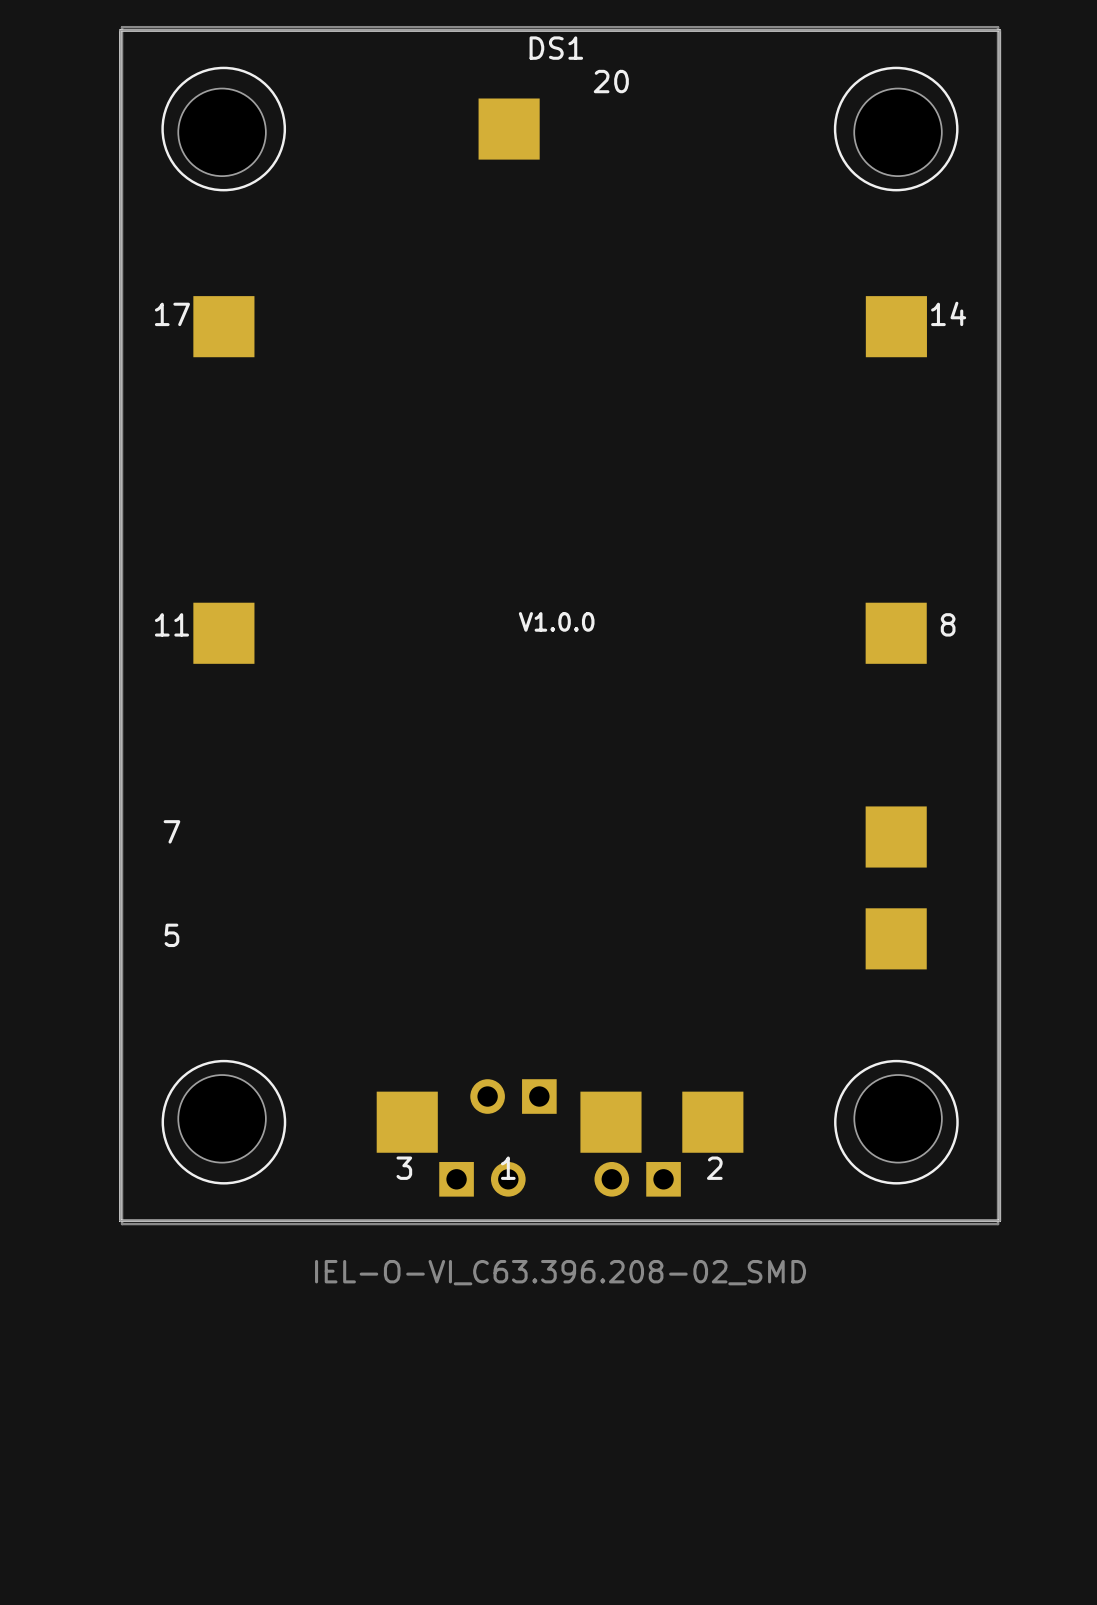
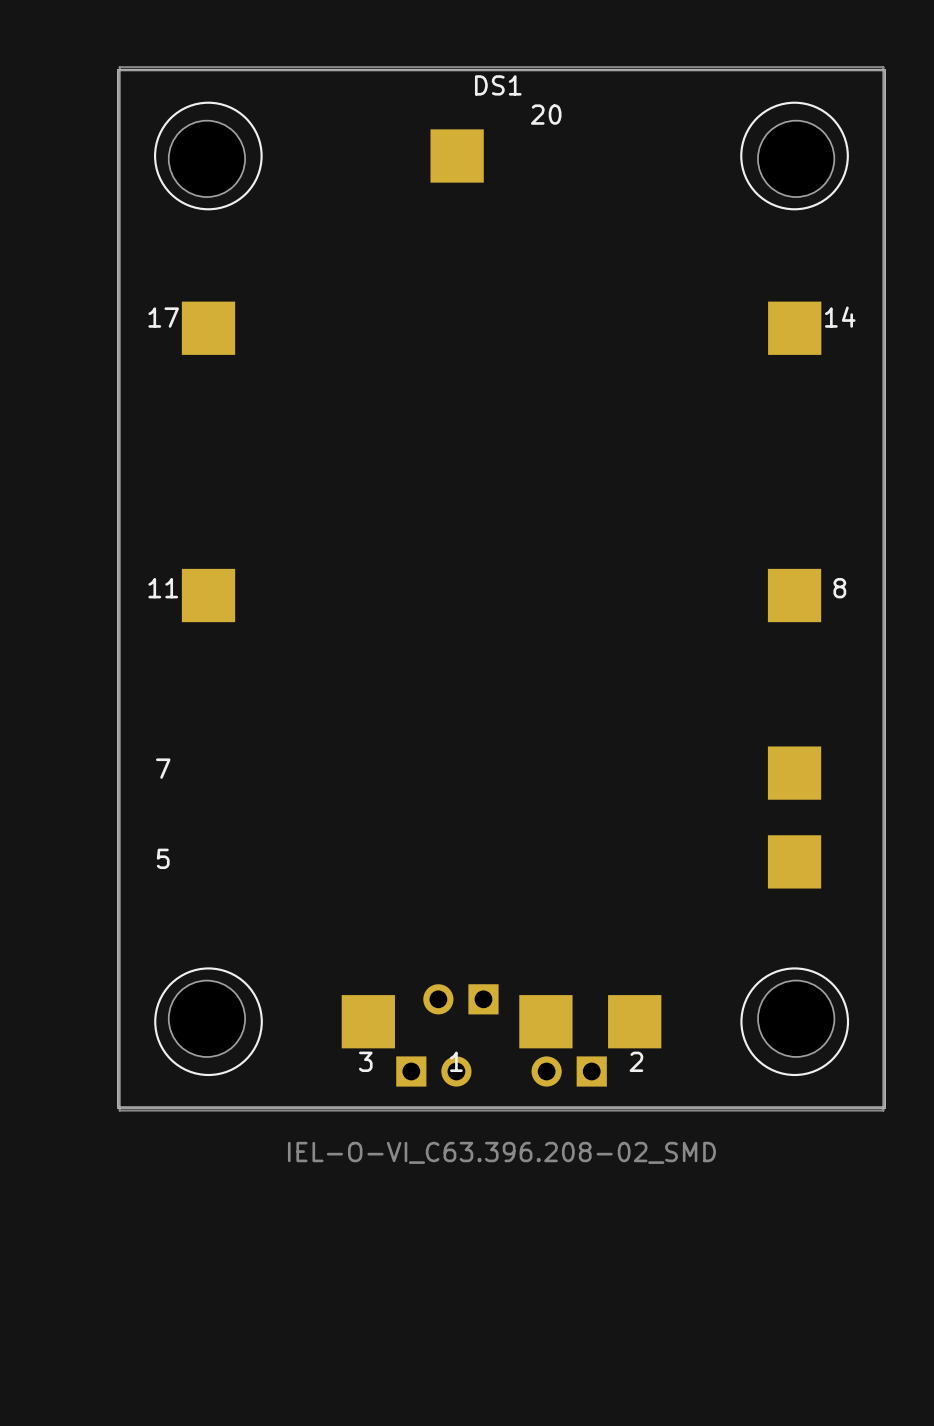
text: V1.0.0 (556, 621) -> none

